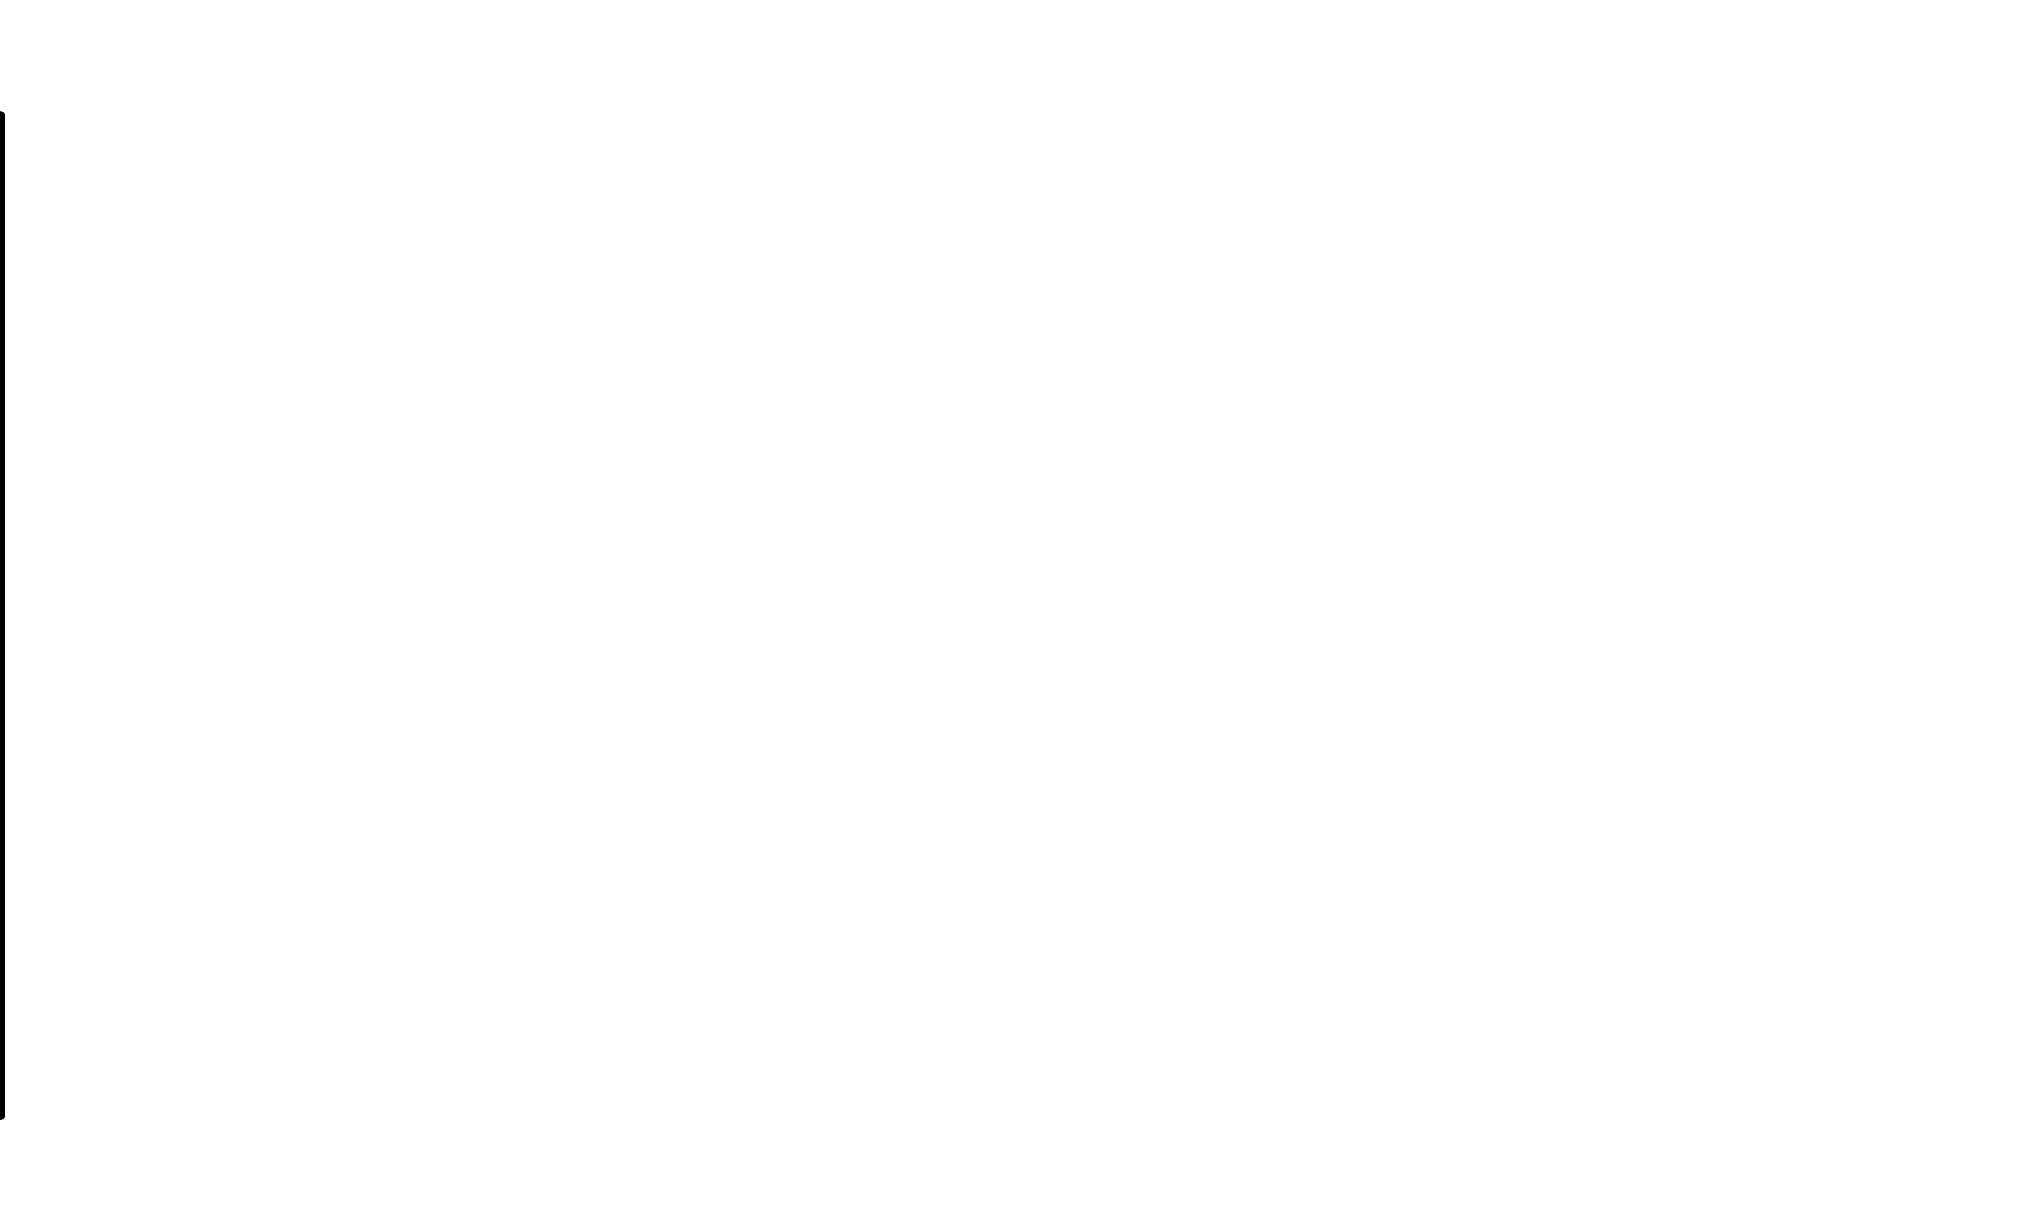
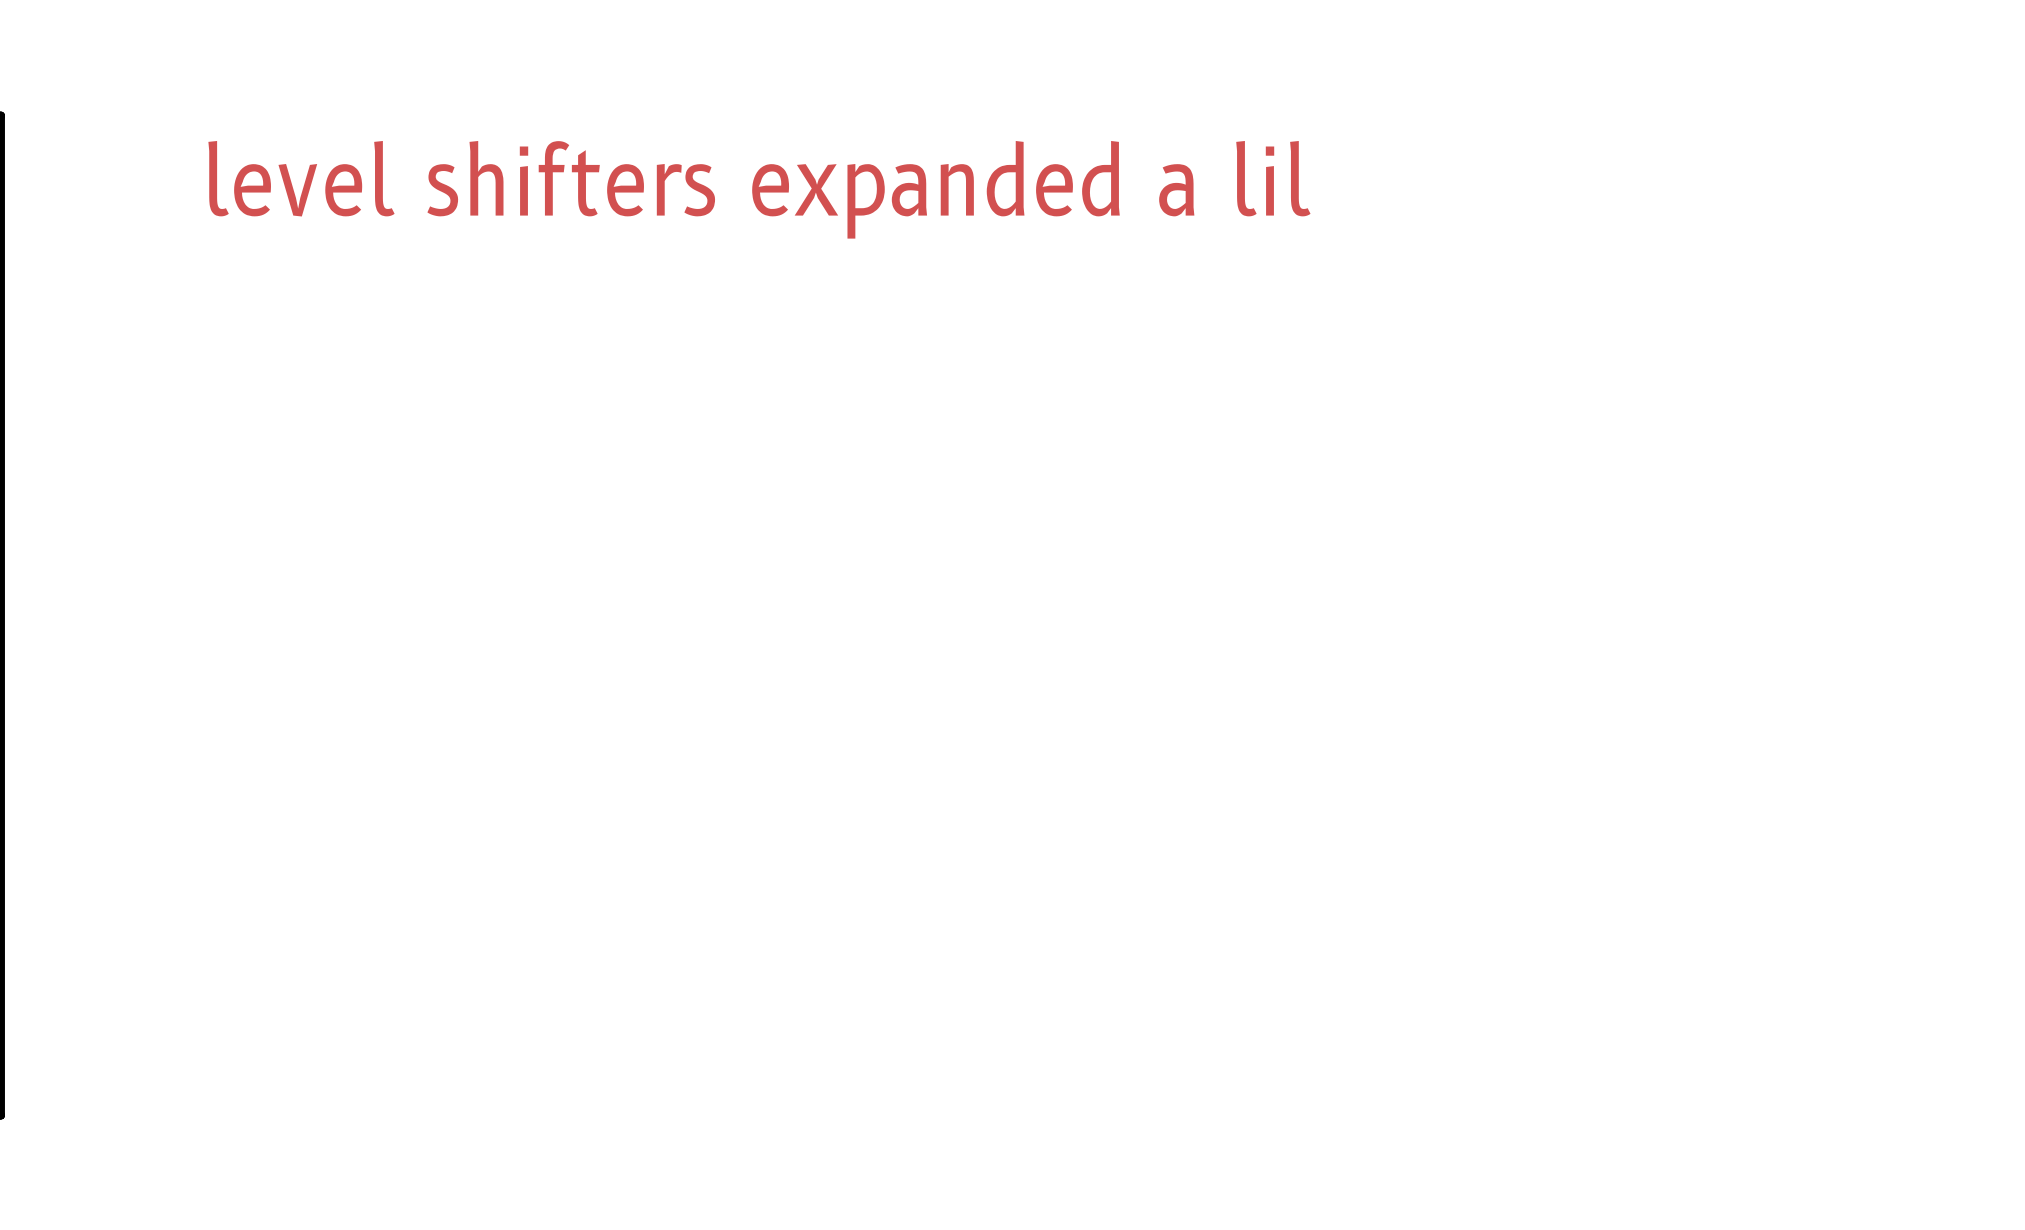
text: none -> level shifters expanded a lil (759, 189)

